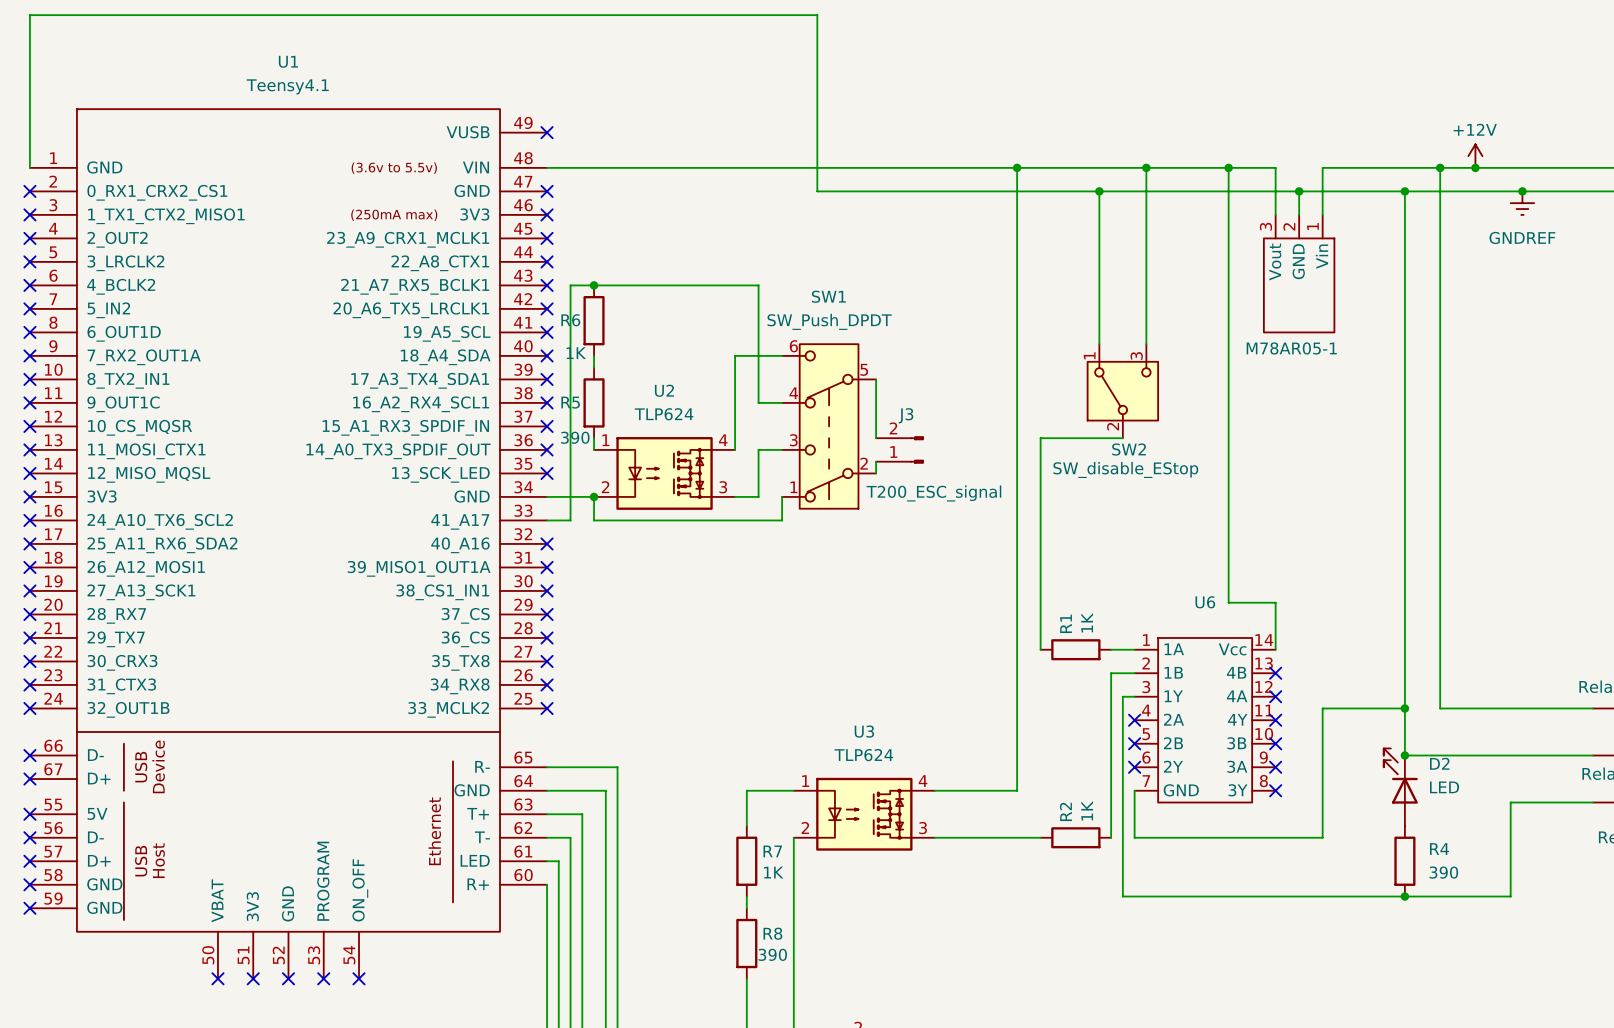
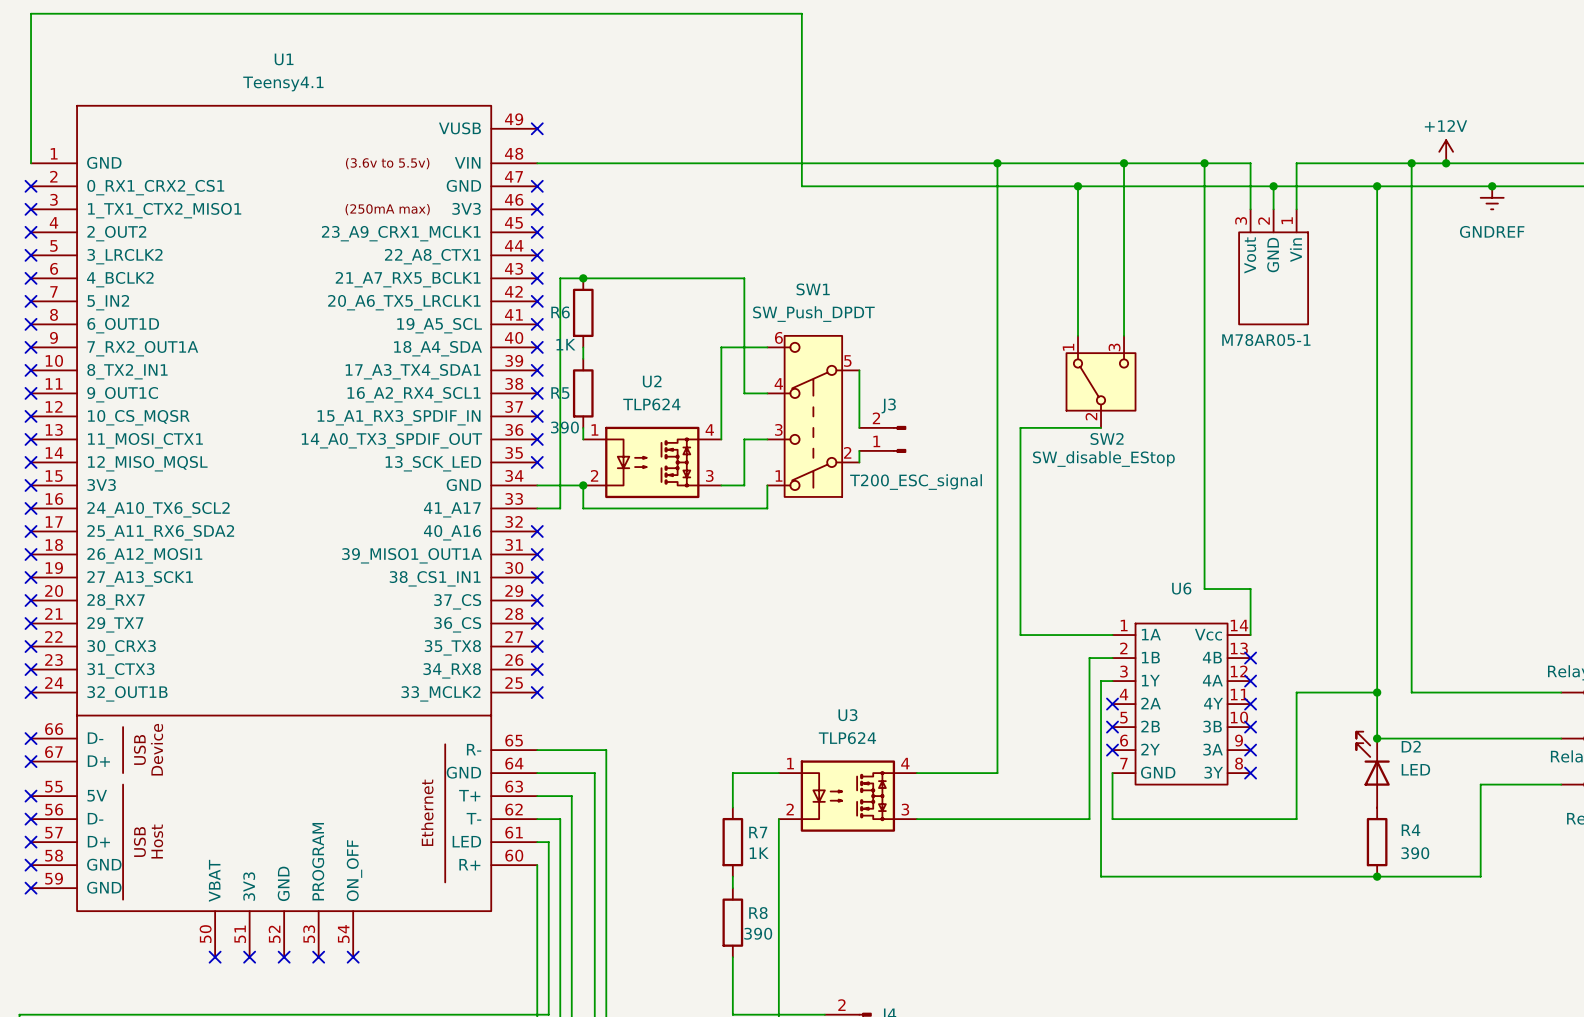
wire: none -> (1020, 635) (1089, 635)
R1: 1K (1075, 649) -> none
wire: none -> (1020, 819) (1089, 819)
R2: 1K (1075, 837) -> none

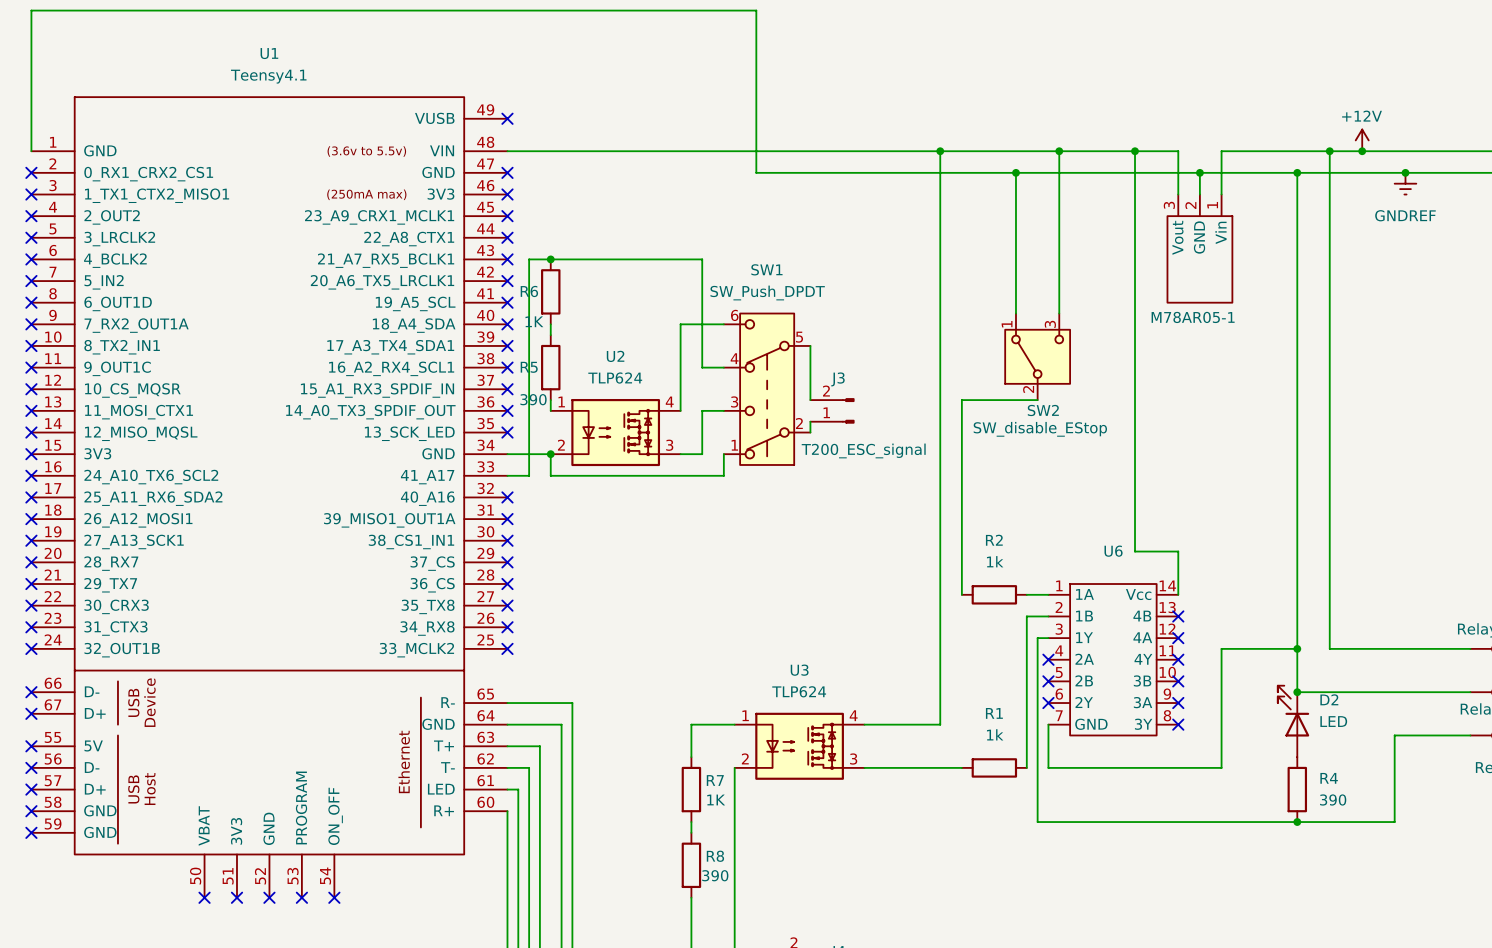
wire: (1020, 635) (1089, 635) -> none
R2: none -> 1k (994, 594)
wire: (1020, 819) (1089, 819) -> none
R1: none -> 1k (994, 767)

